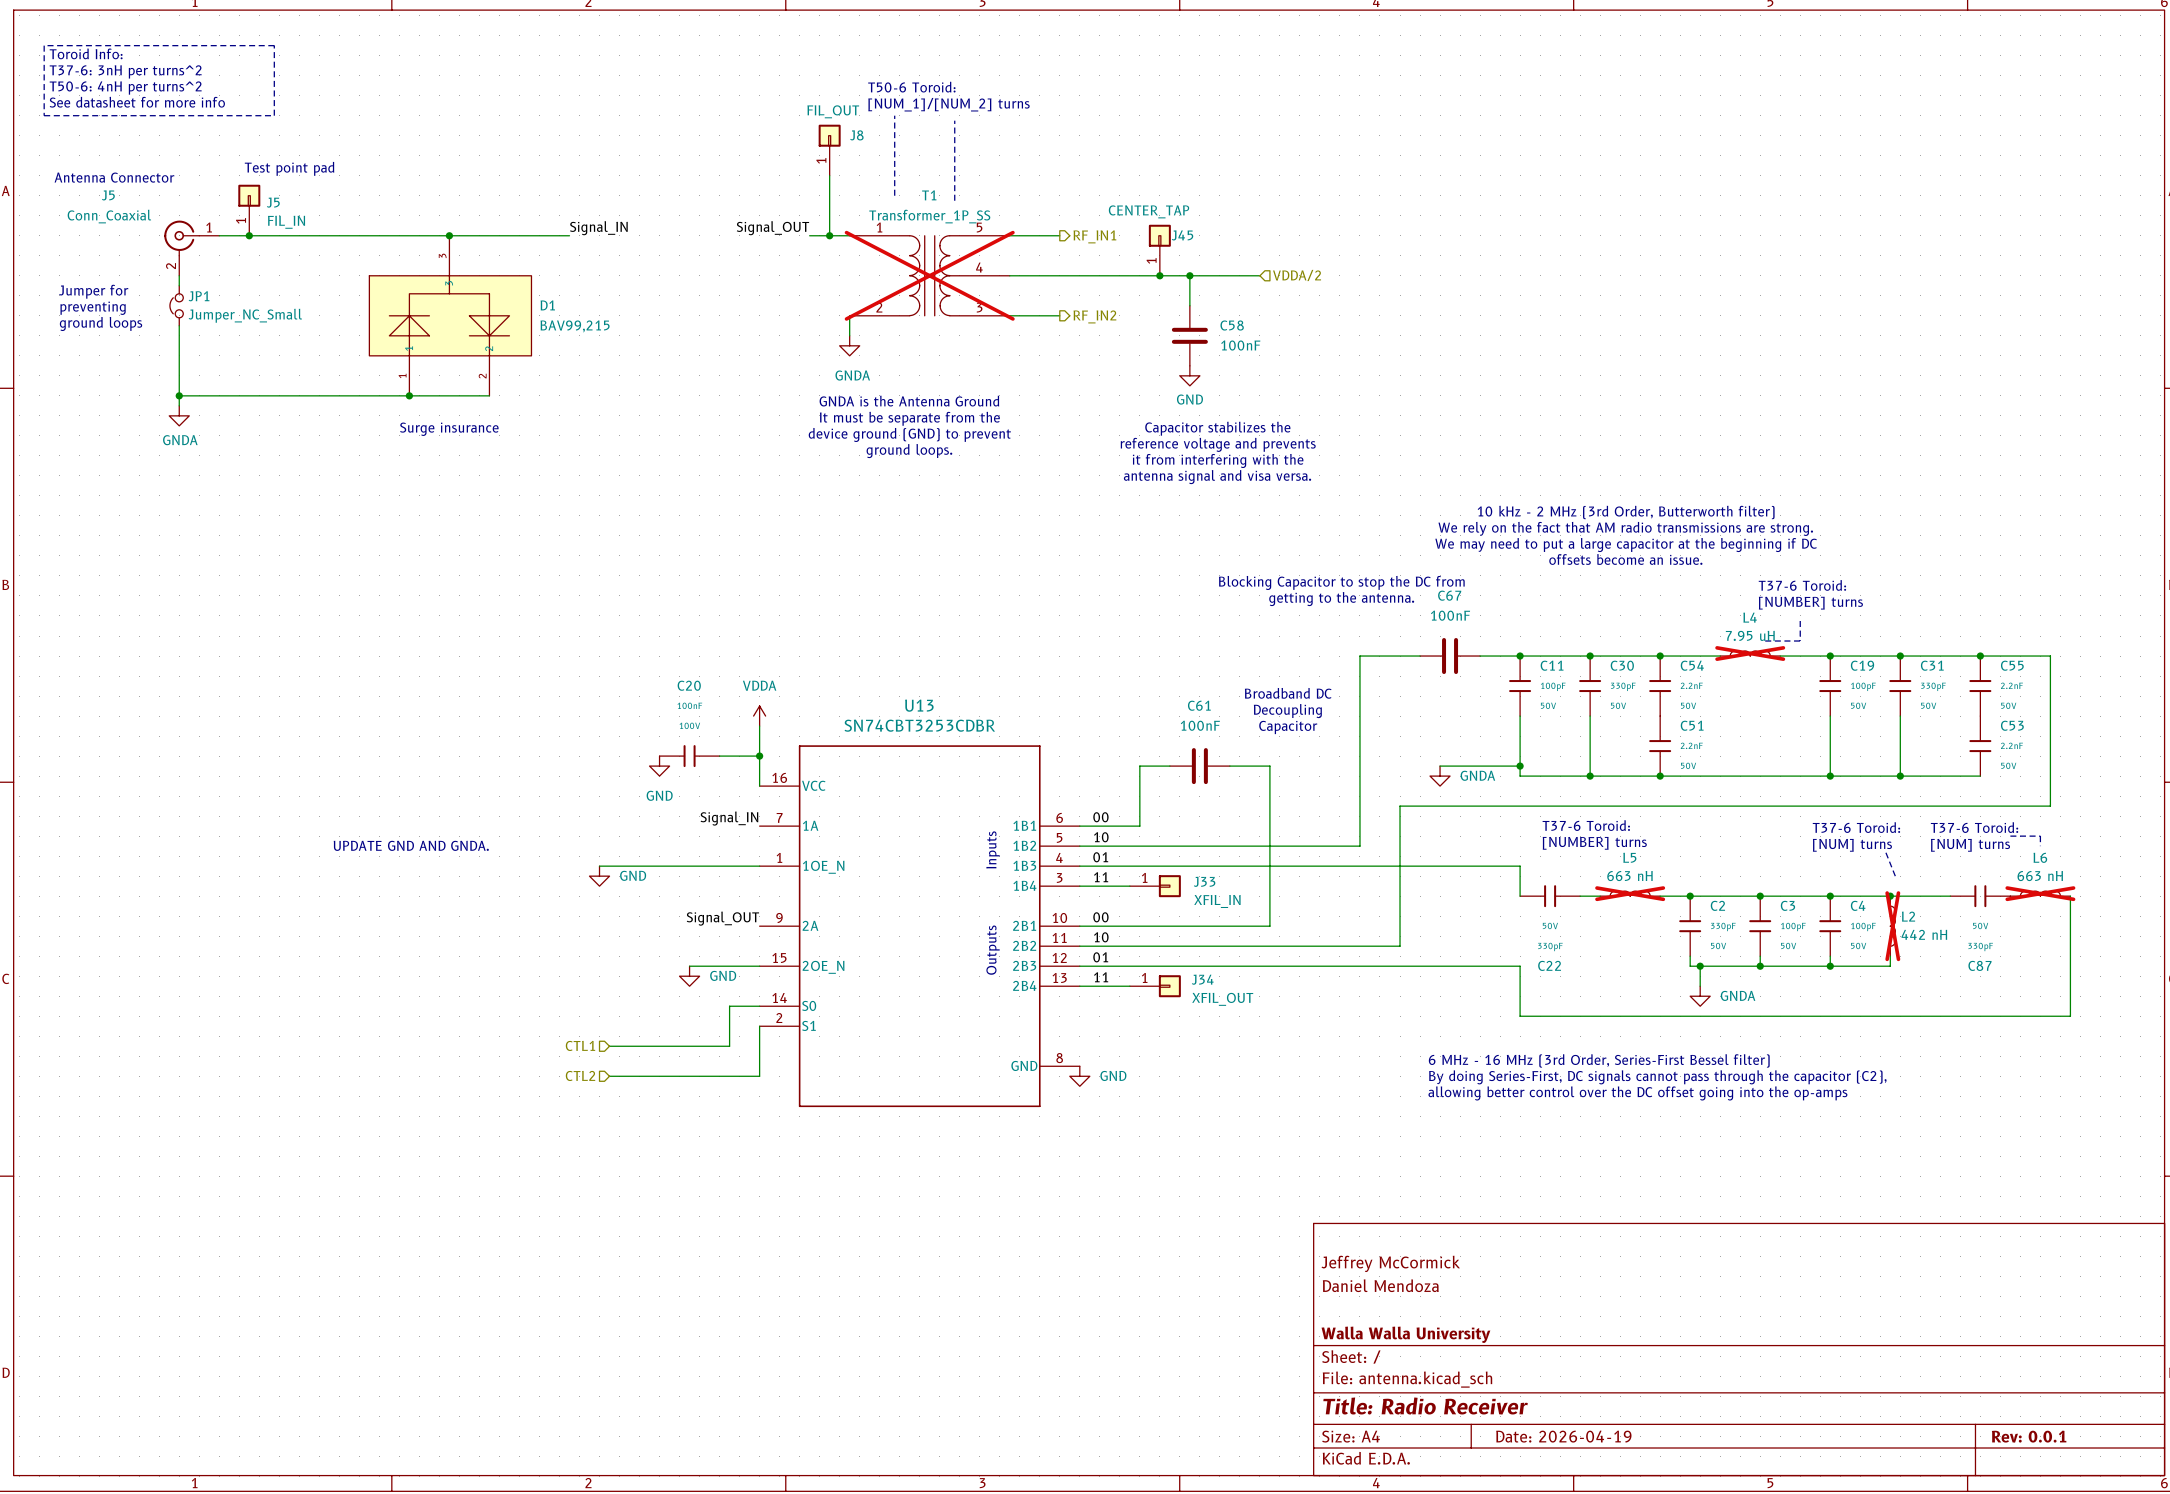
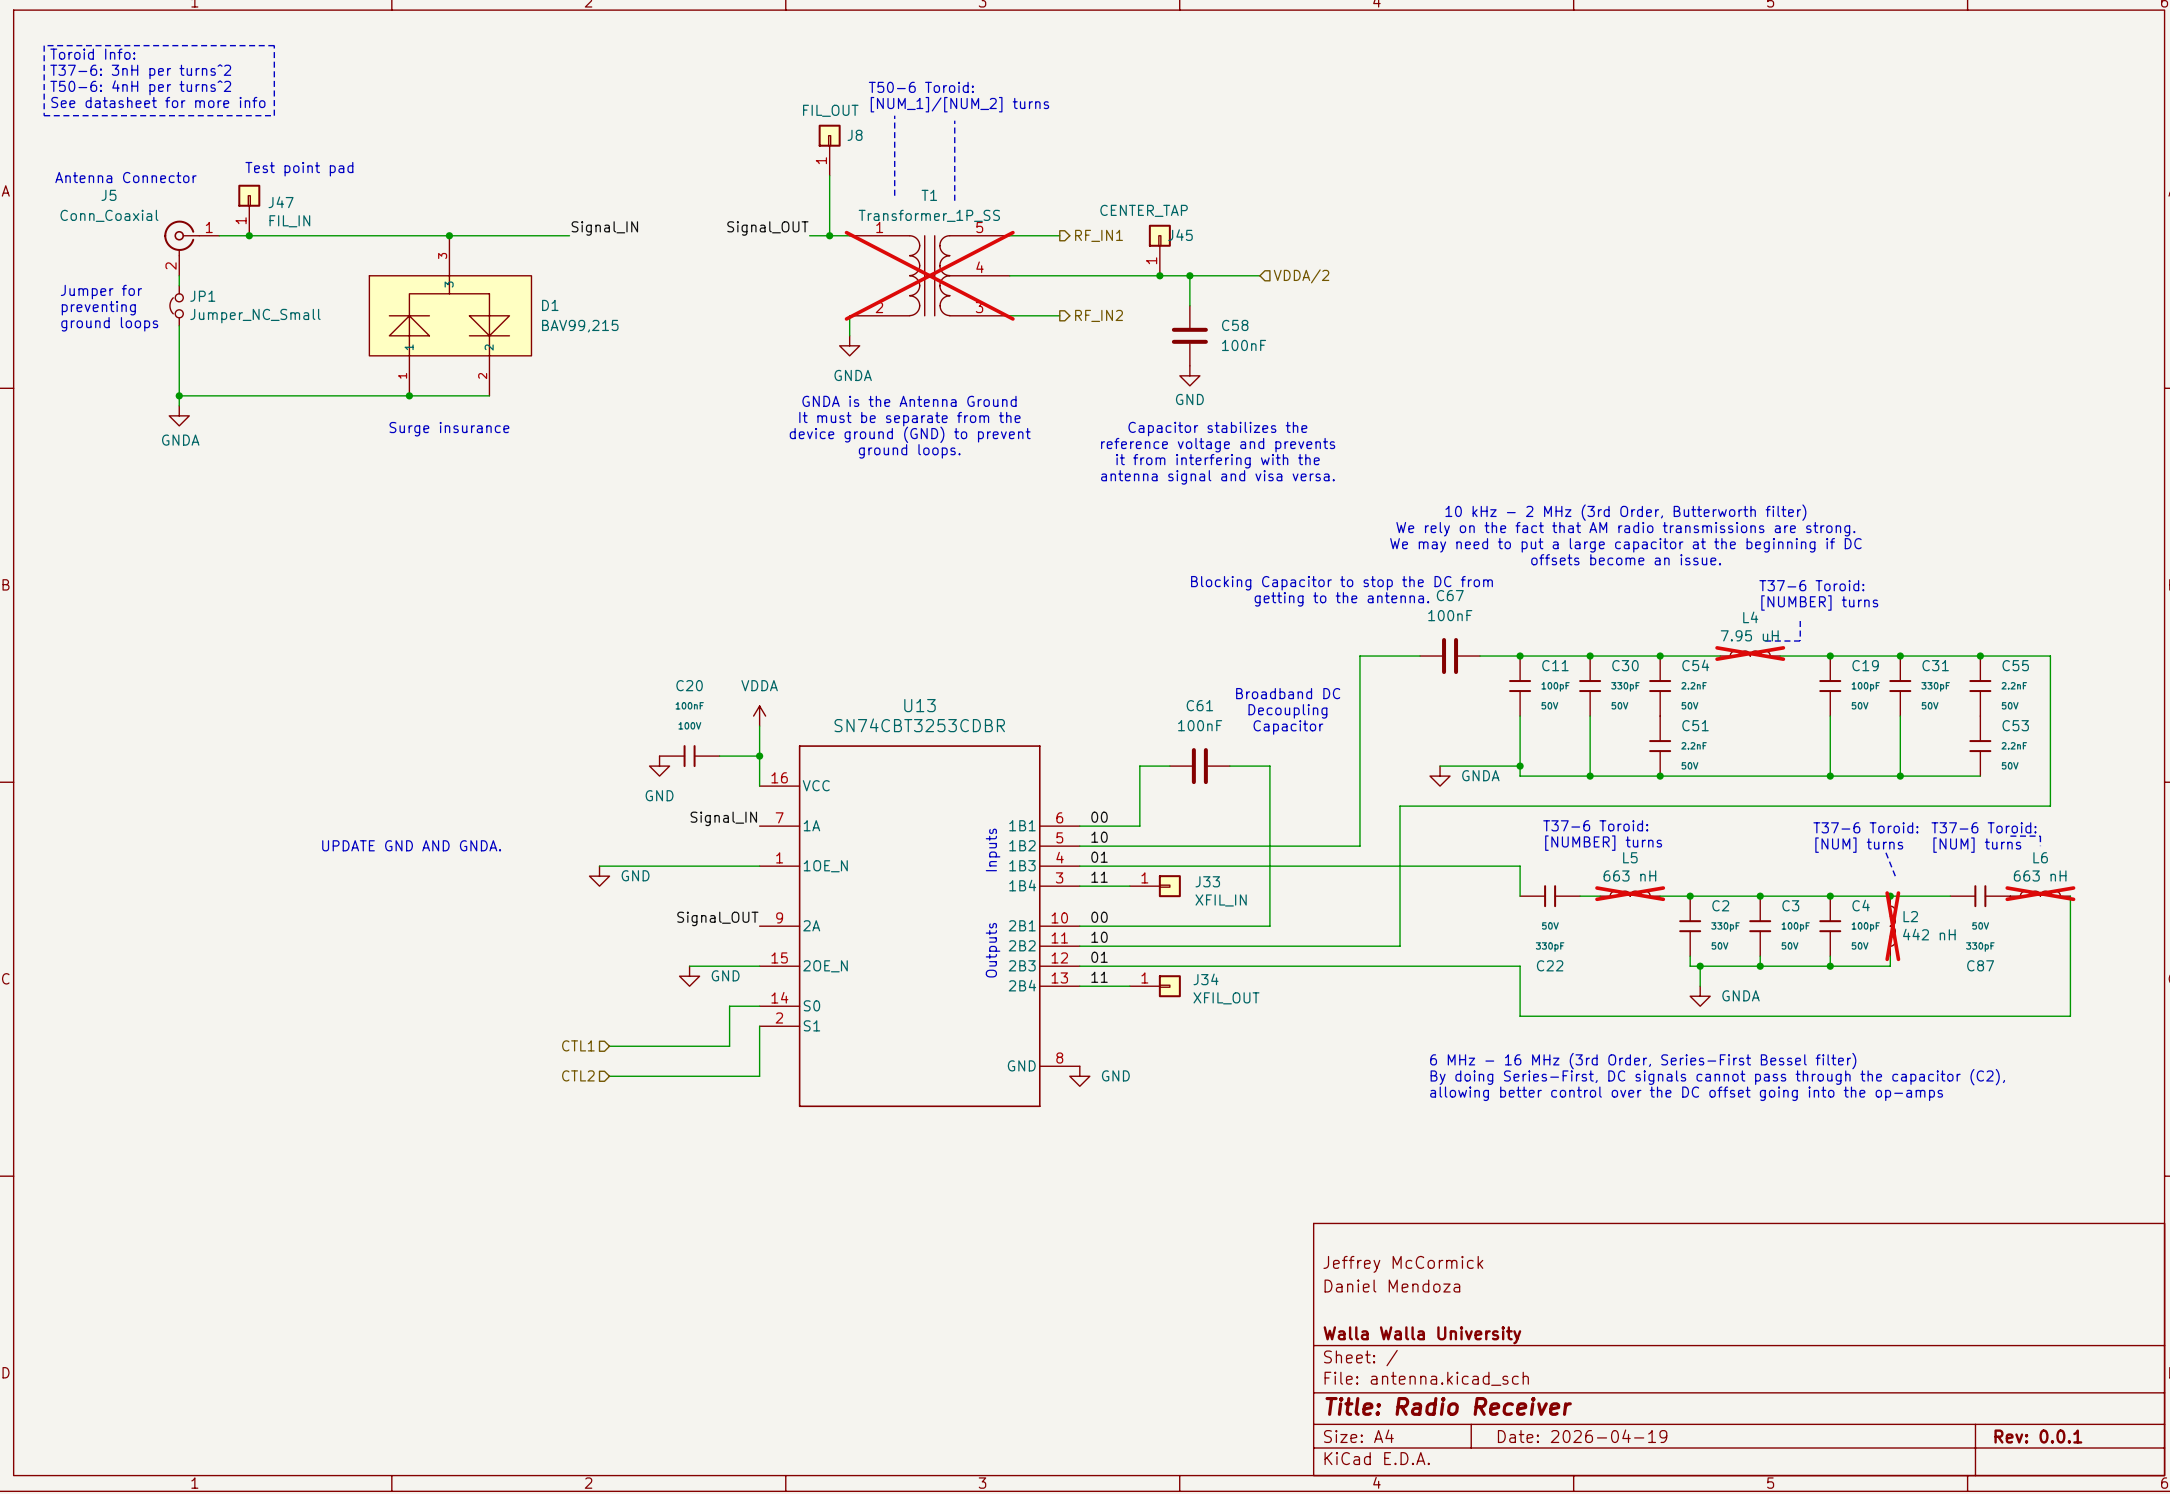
J5 name: J5 (273, 202) -> J47 (281, 202)

